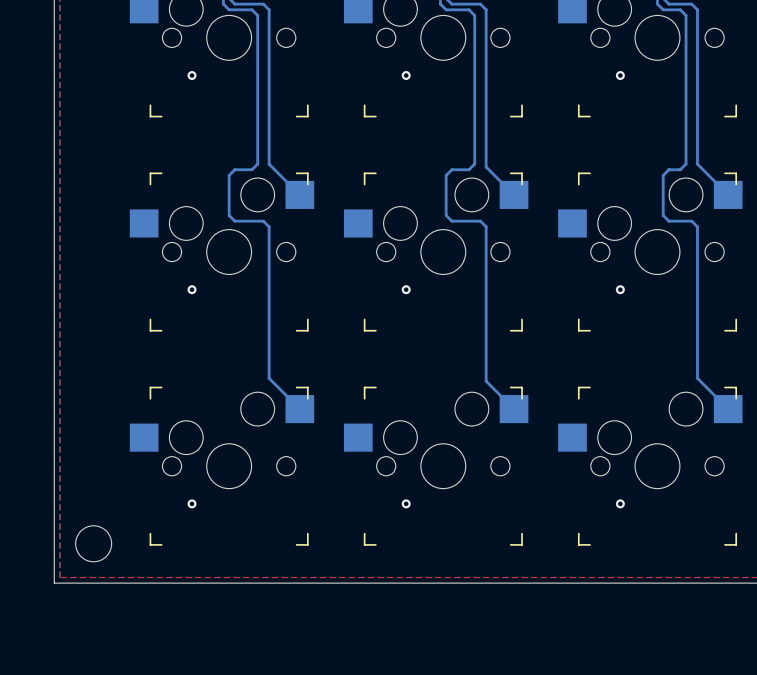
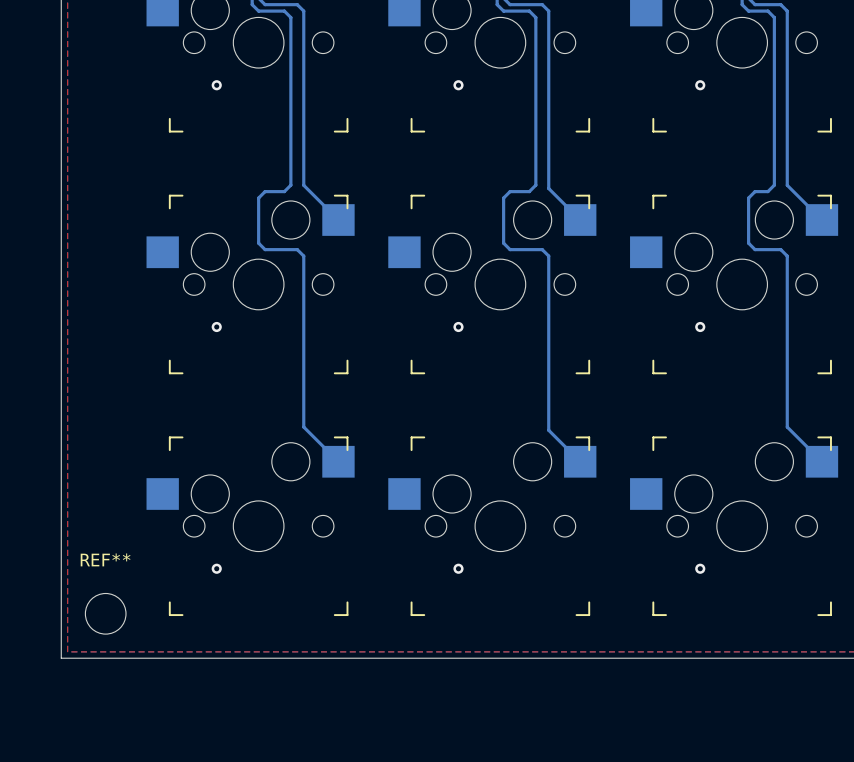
REF** name: none -> REF** (105, 559)

